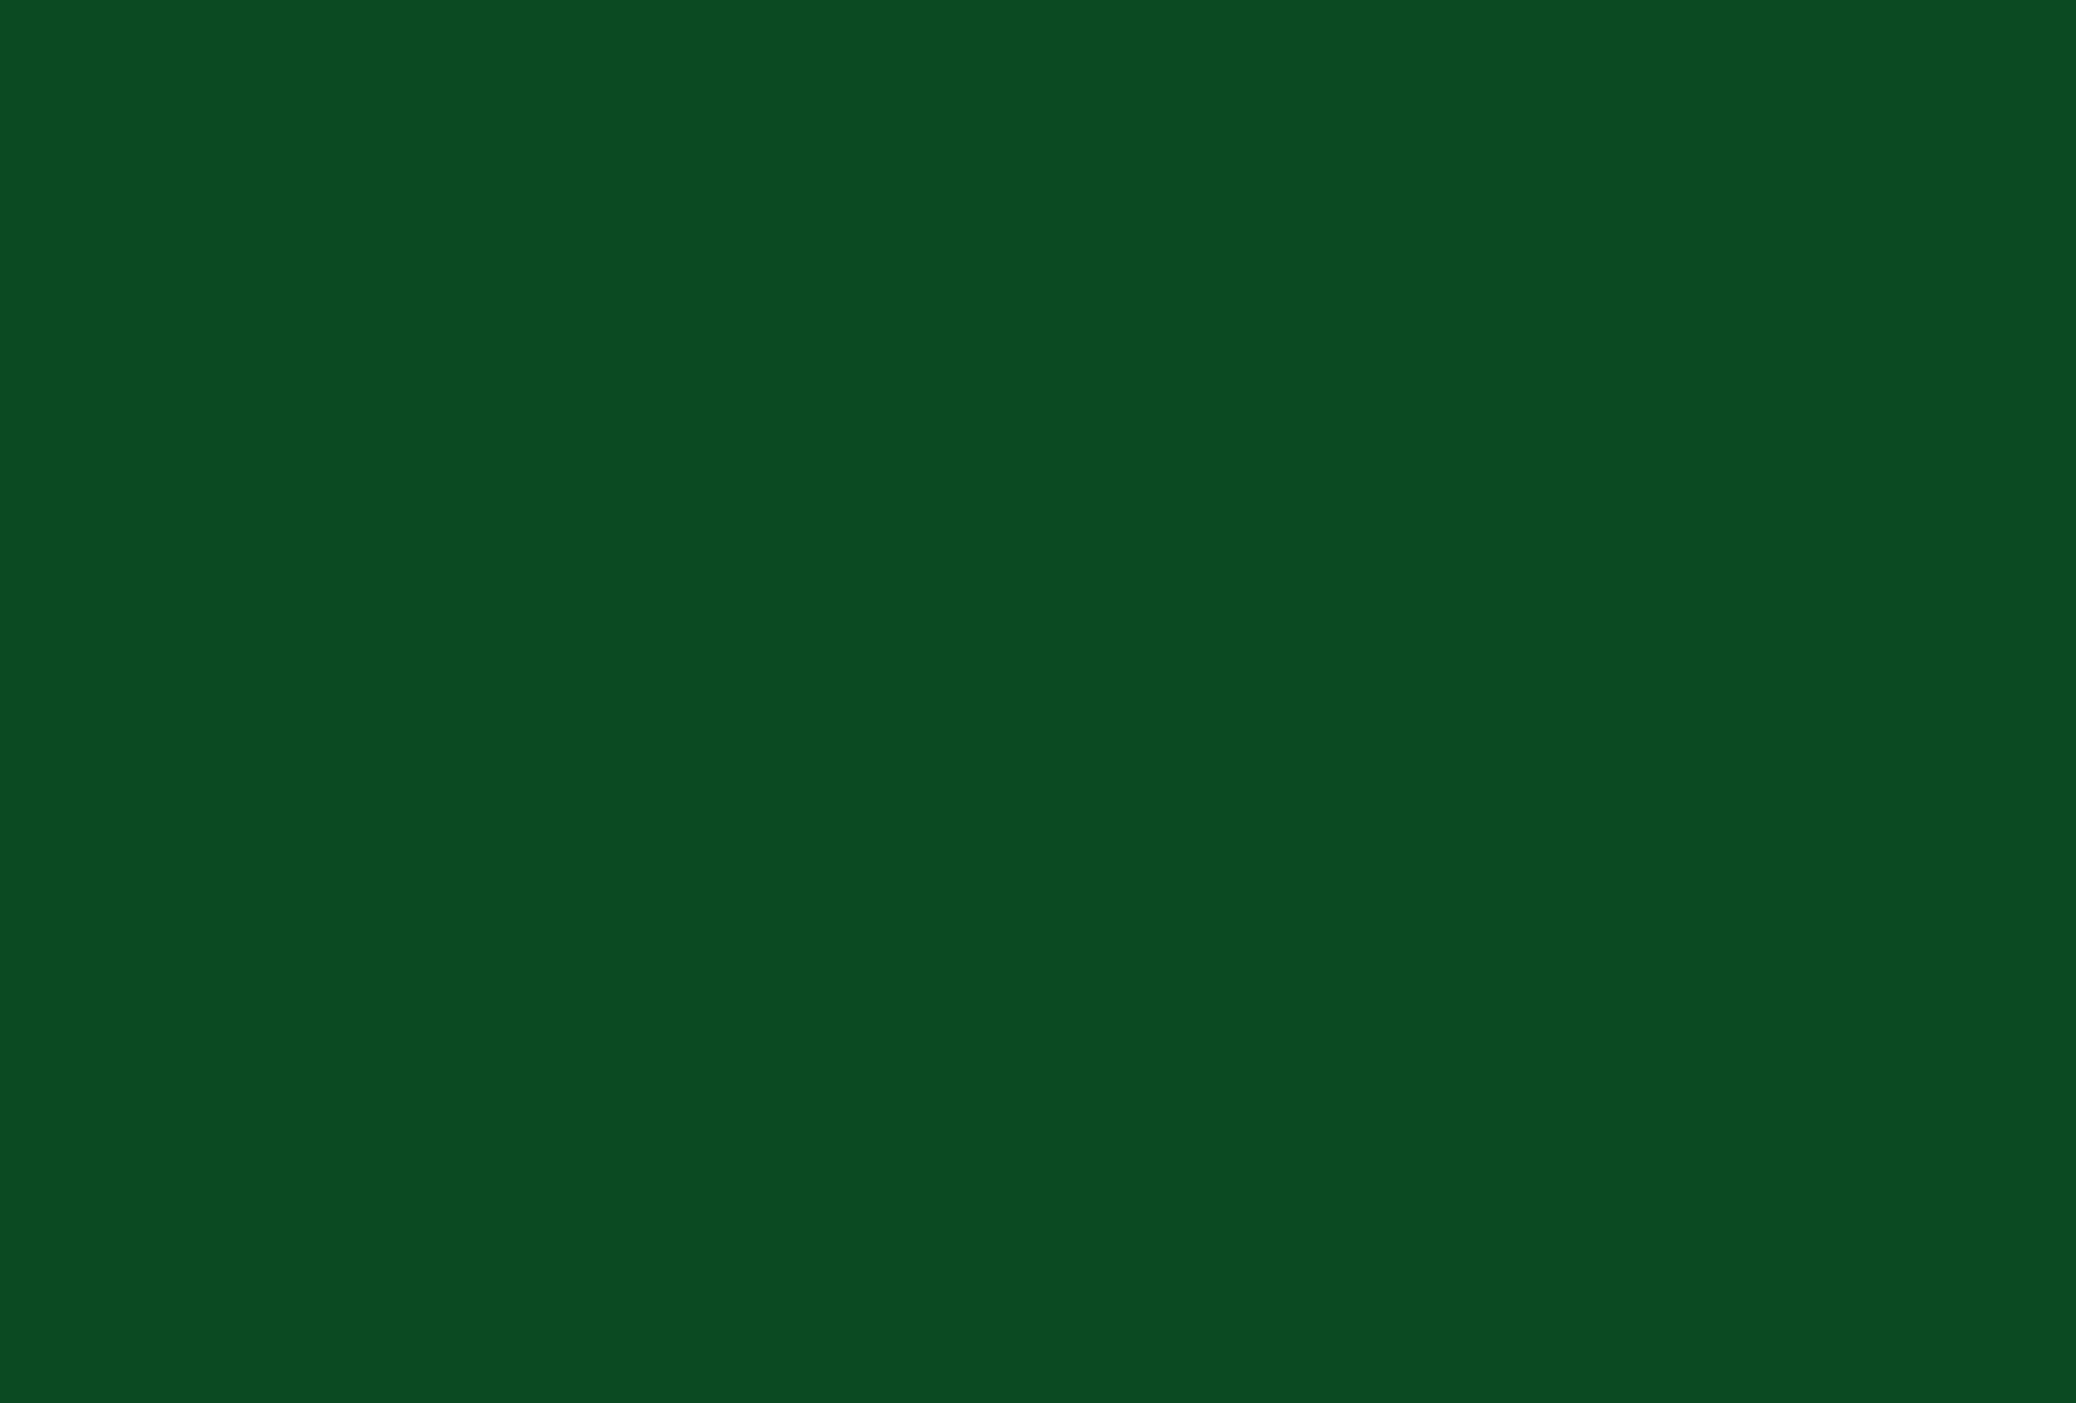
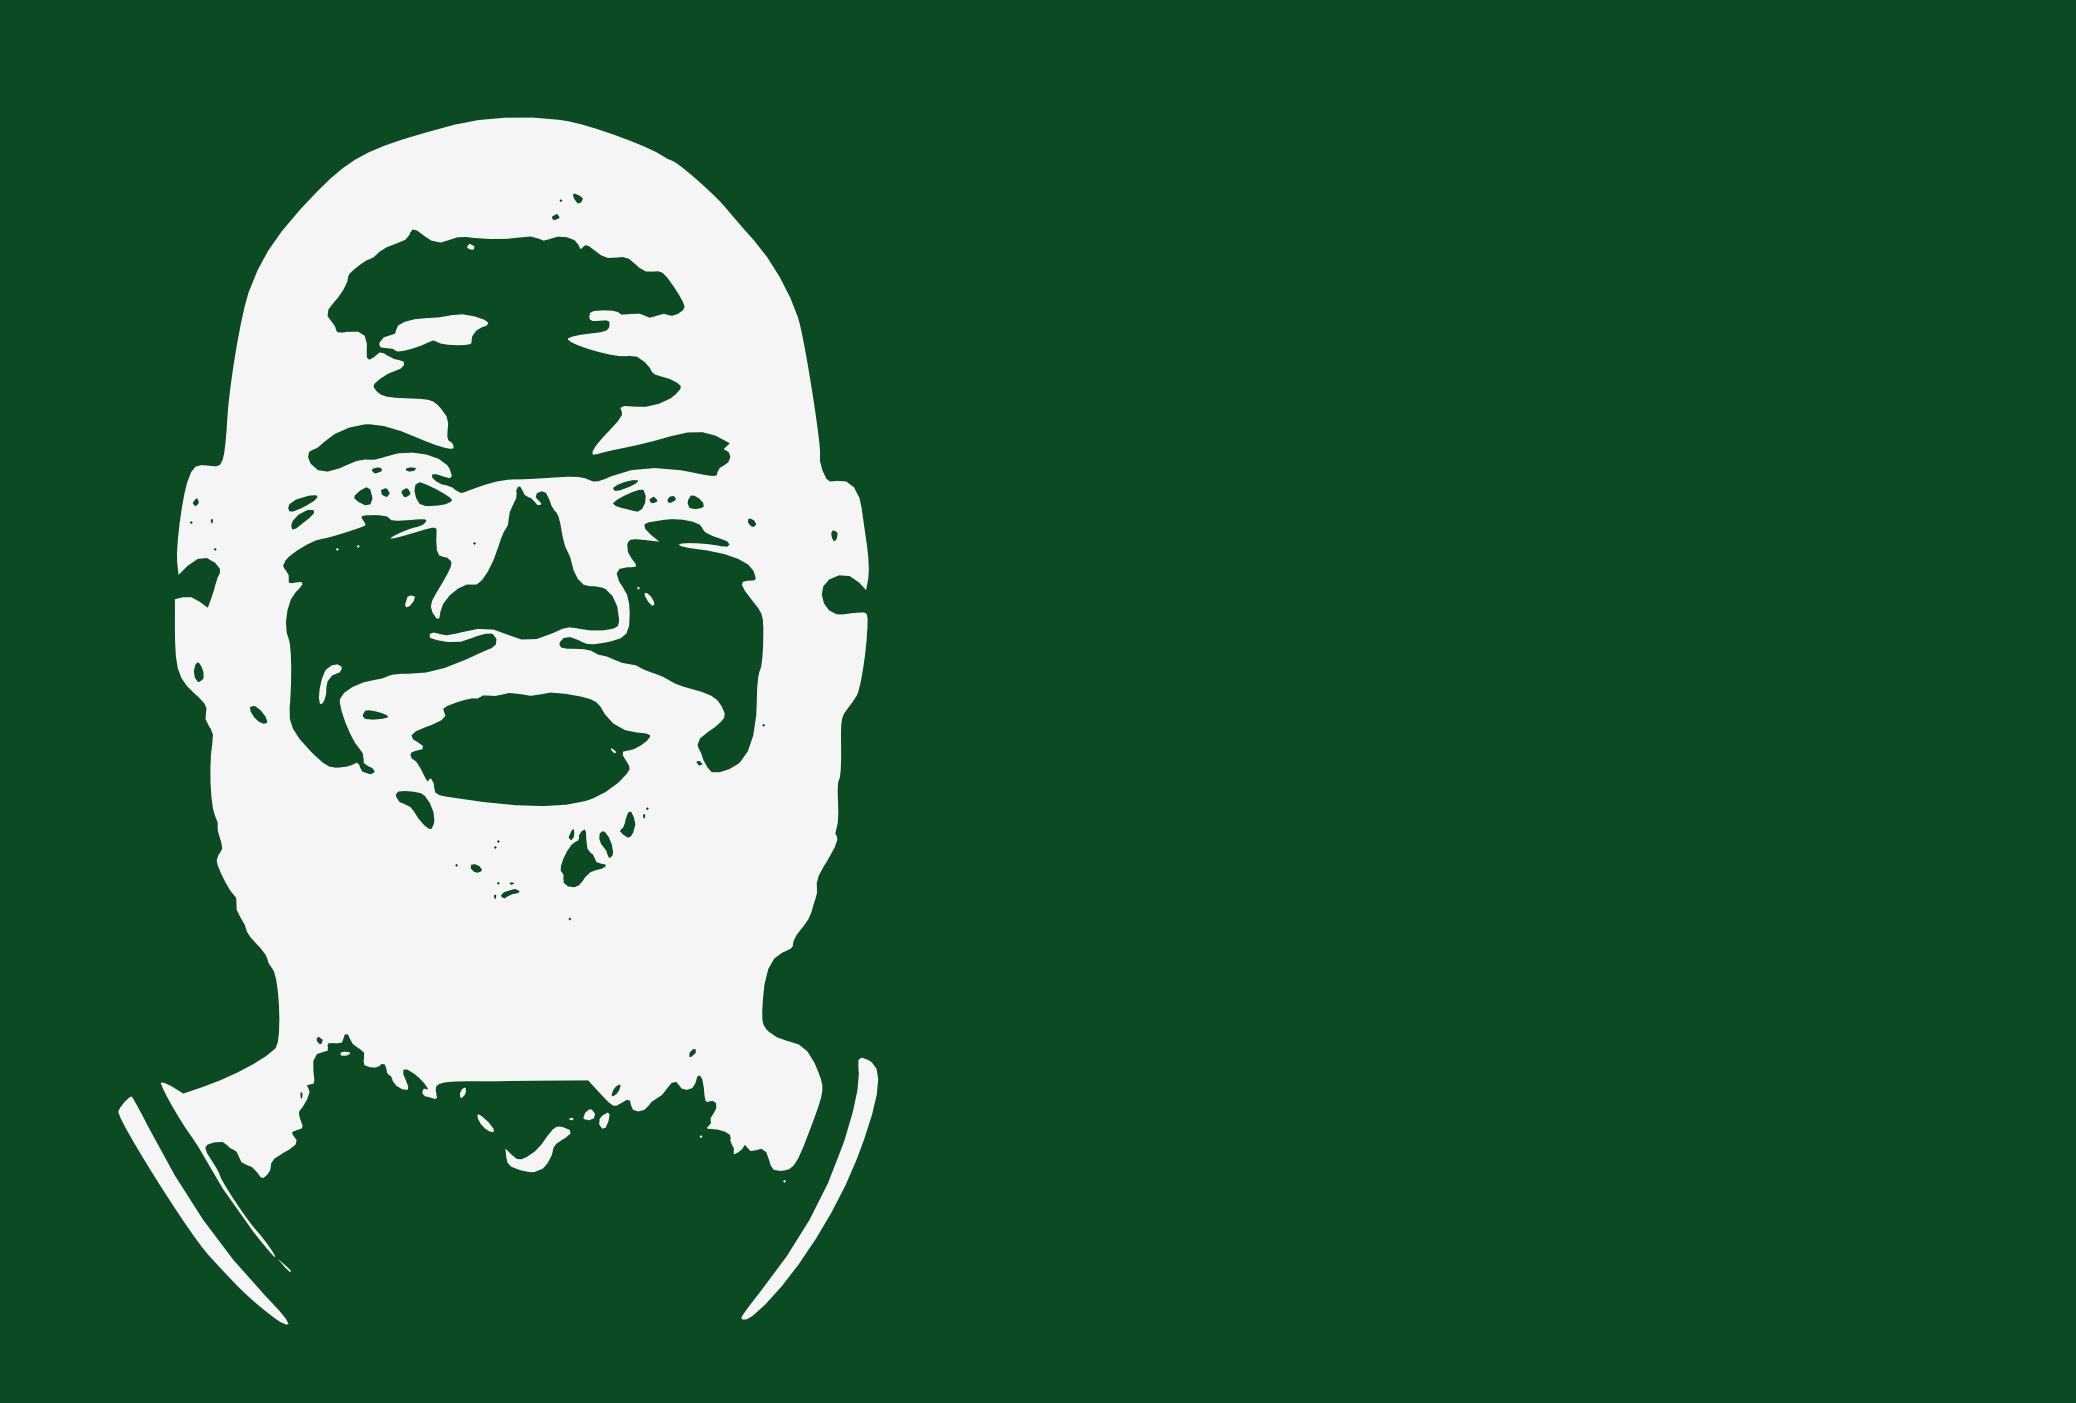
drawing: none -> [118, 117, 879, 1325]

